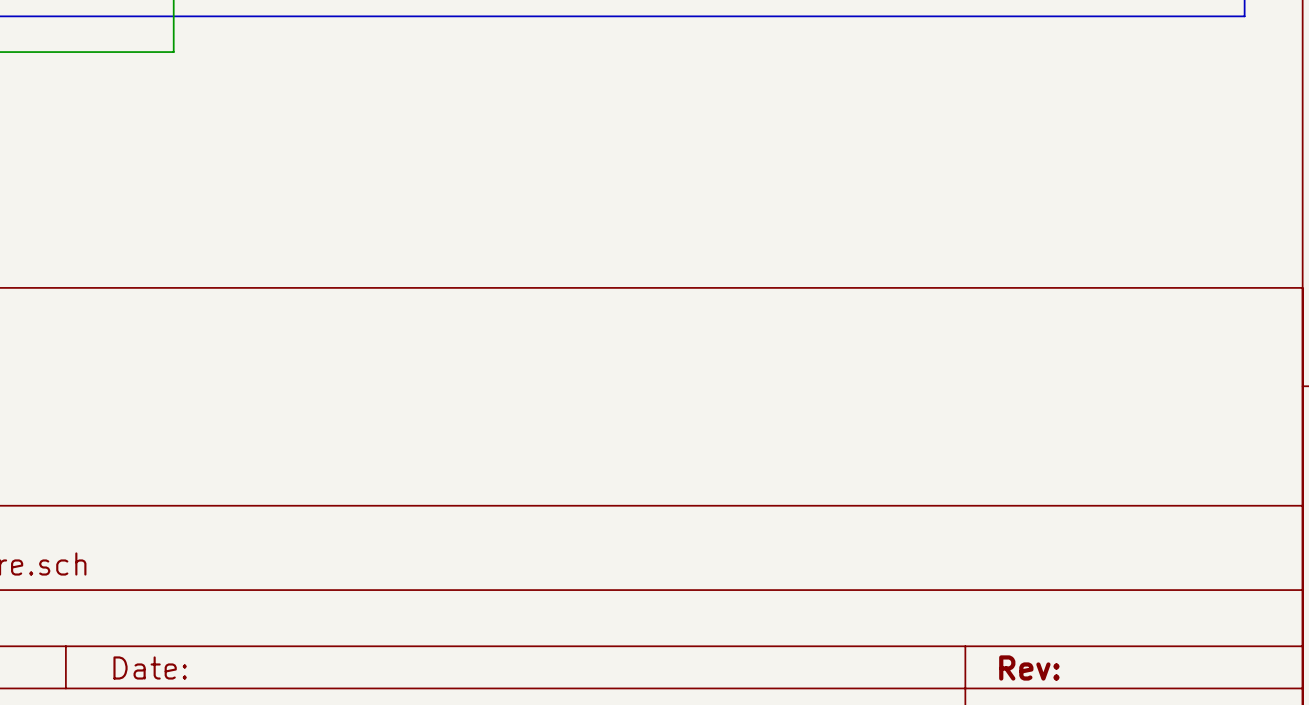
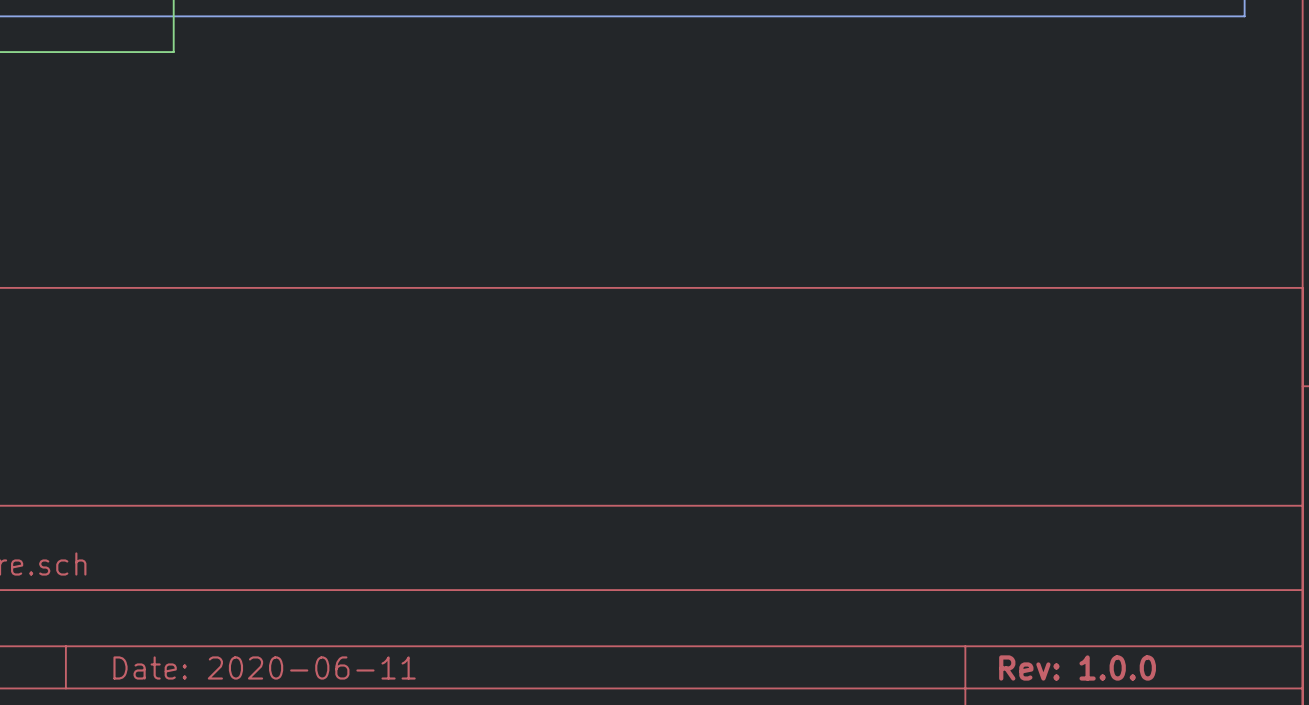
title block: Date: (150, 667) -> Date: 2020-06-11 (264, 667)
title block: Rev: (1029, 667) -> Rev: 1.0.0 (1077, 667)

